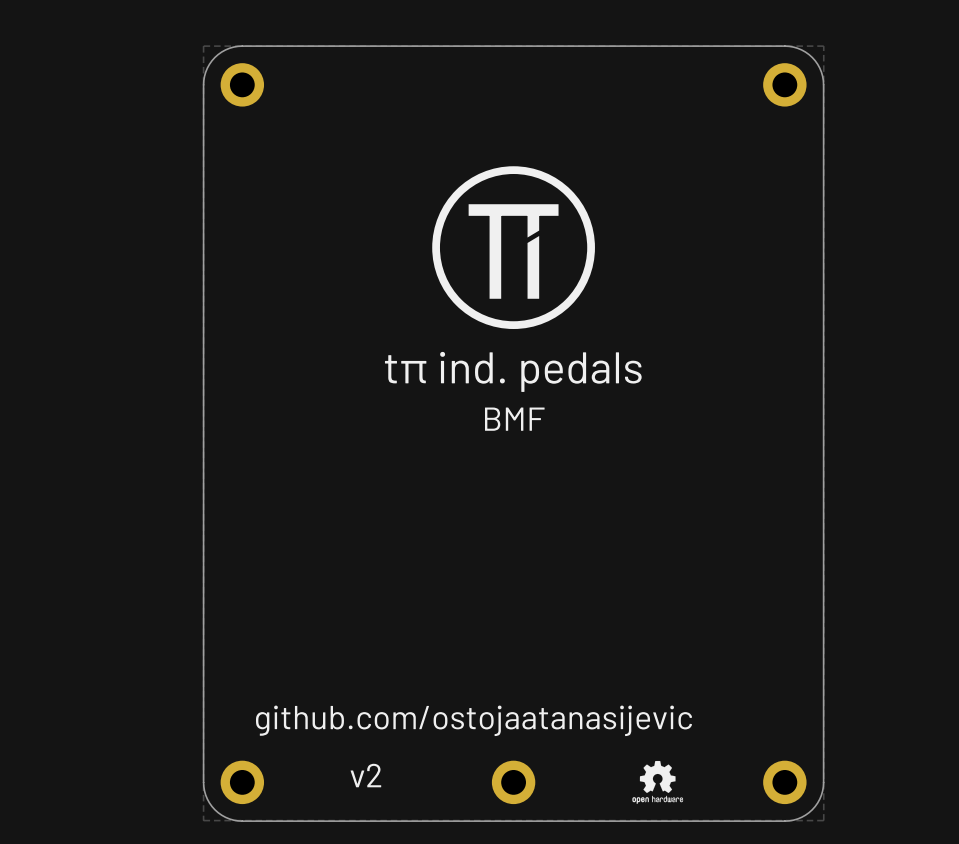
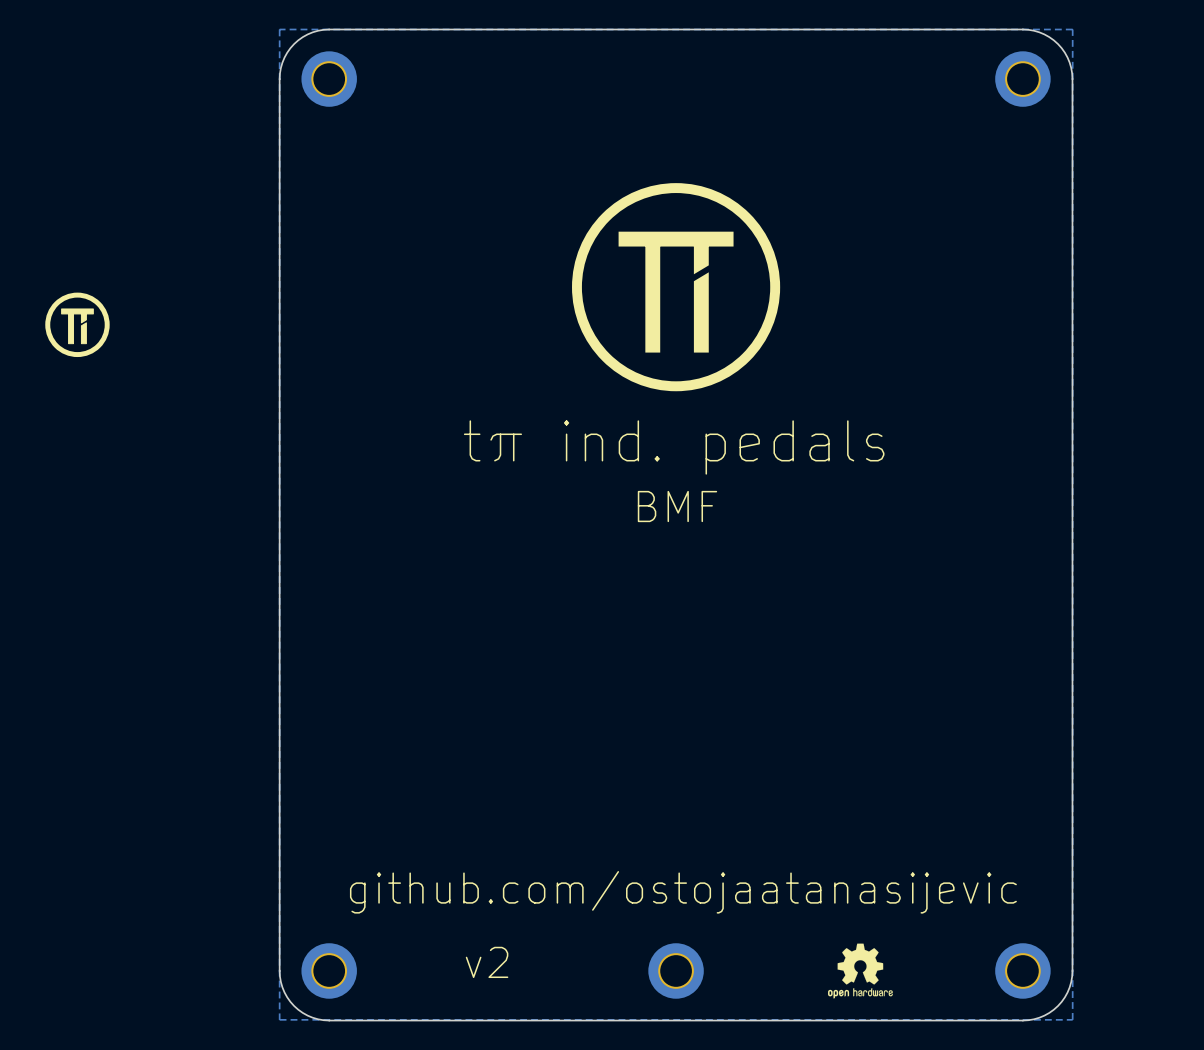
drawing: none -> [45, 292, 110, 358]

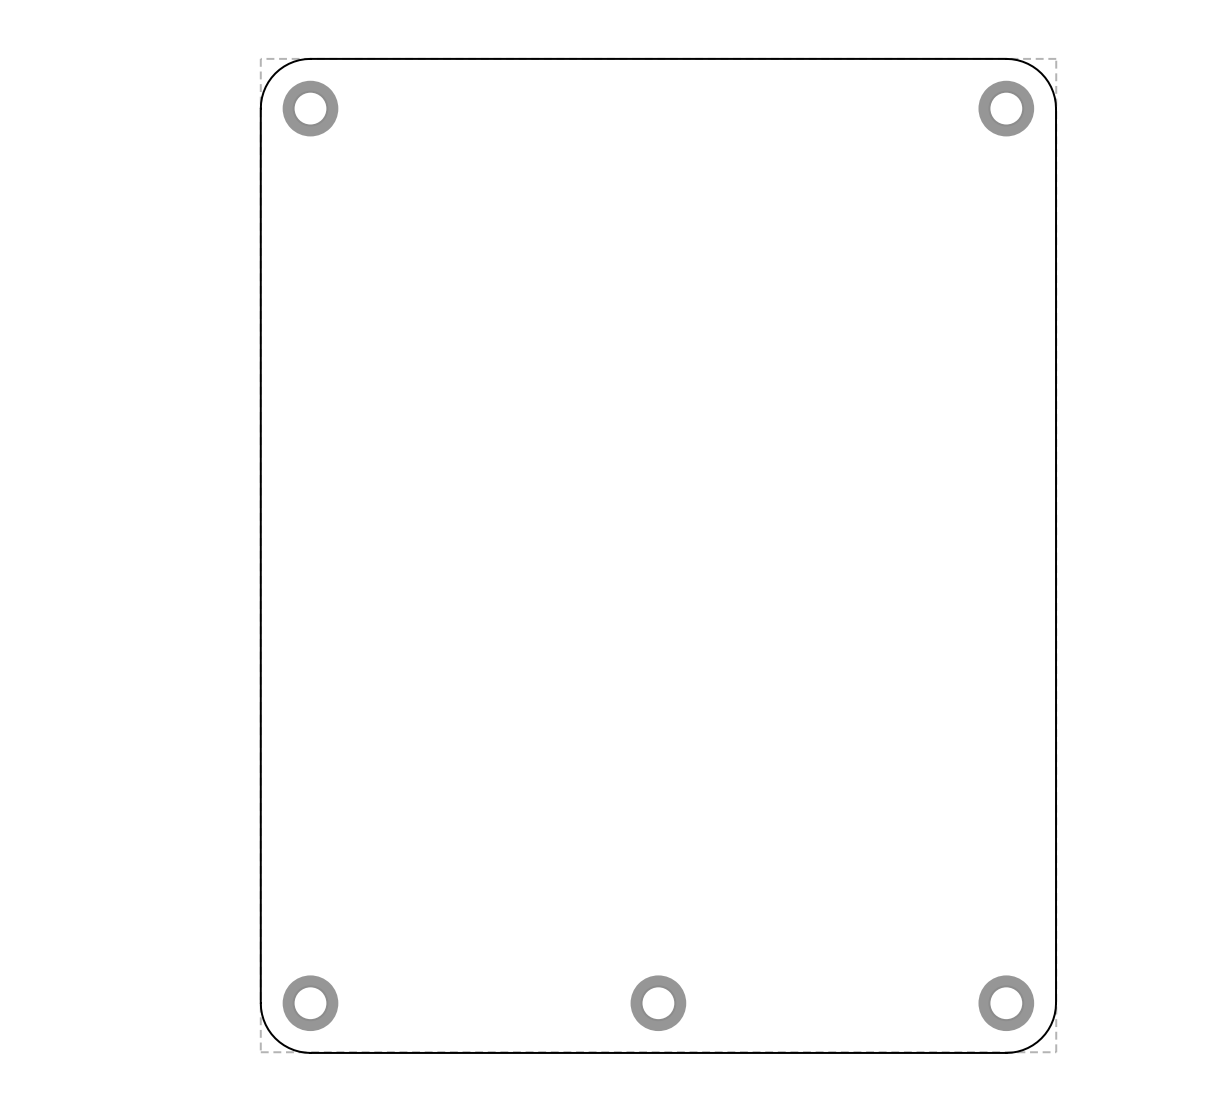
drawing: [572, 183, 781, 392] -> none
drawing: [45, 292, 110, 358] -> none
text: tπ ind. pedals (674, 447) -> none
text: BMF (677, 506) -> none
text: github.com/ostojaatanasijevic (683, 892) -> none
drawing: [827, 943, 893, 999] -> none
text: v2 (487, 962) -> none

